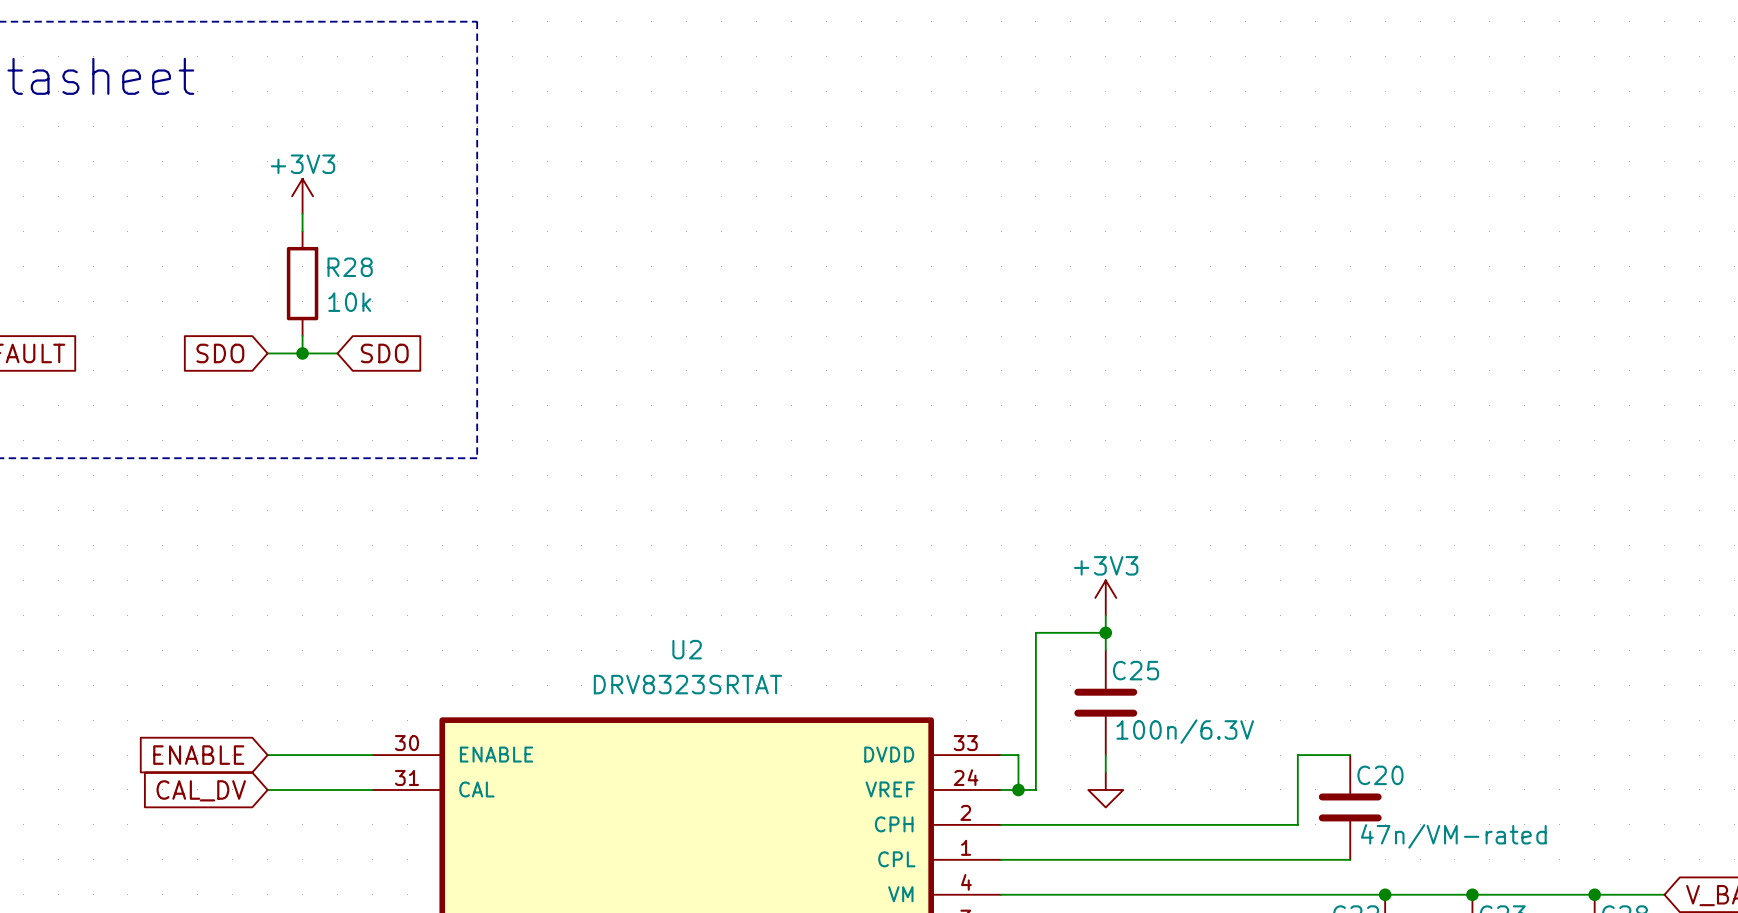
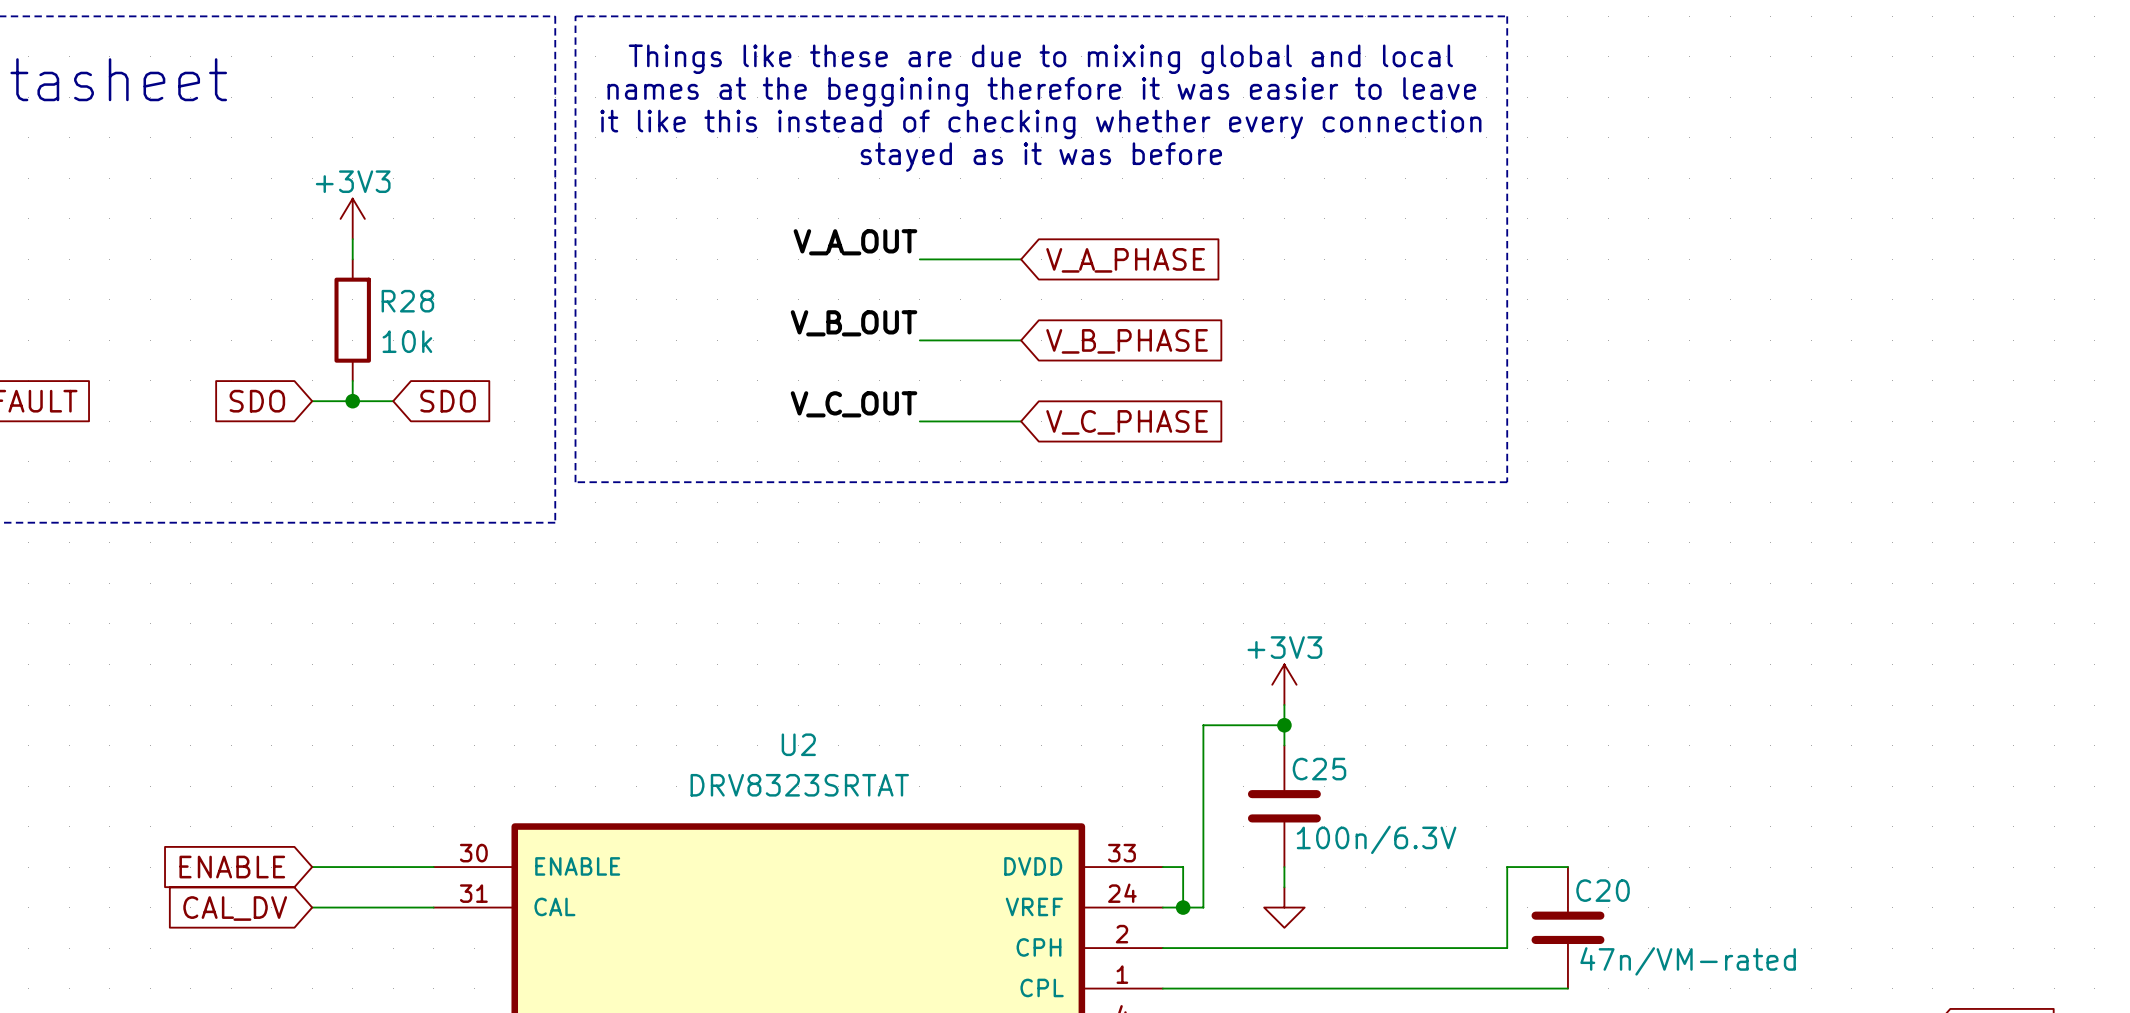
line: none -> (575, 16) (1507, 16) (1507, 482) (575, 482) (575, 16)
text: none -> Things like these are due to mixing global and local (1040, 59)
text: none -> names at the beggining therefore it was easier to leave (1041, 91)
text: none -> it like this instead of checking whether every connection (1040, 124)
text: none -> stayed as it was before (1041, 157)
label: none -> V_A_OUT (855, 242)
wire: none -> (919, 259) (1021, 259)
global label: none -> V_A_PHASE (1125, 260)
label: none -> V_B_OUT (853, 323)
wire: none -> (919, 340) (1021, 340)
global label: none -> V_B_PHASE (1127, 341)
label: none -> V_C_OUT (853, 404)
wire: none -> (919, 421) (1021, 421)
global label: none -> V_C_PHASE (1127, 422)

